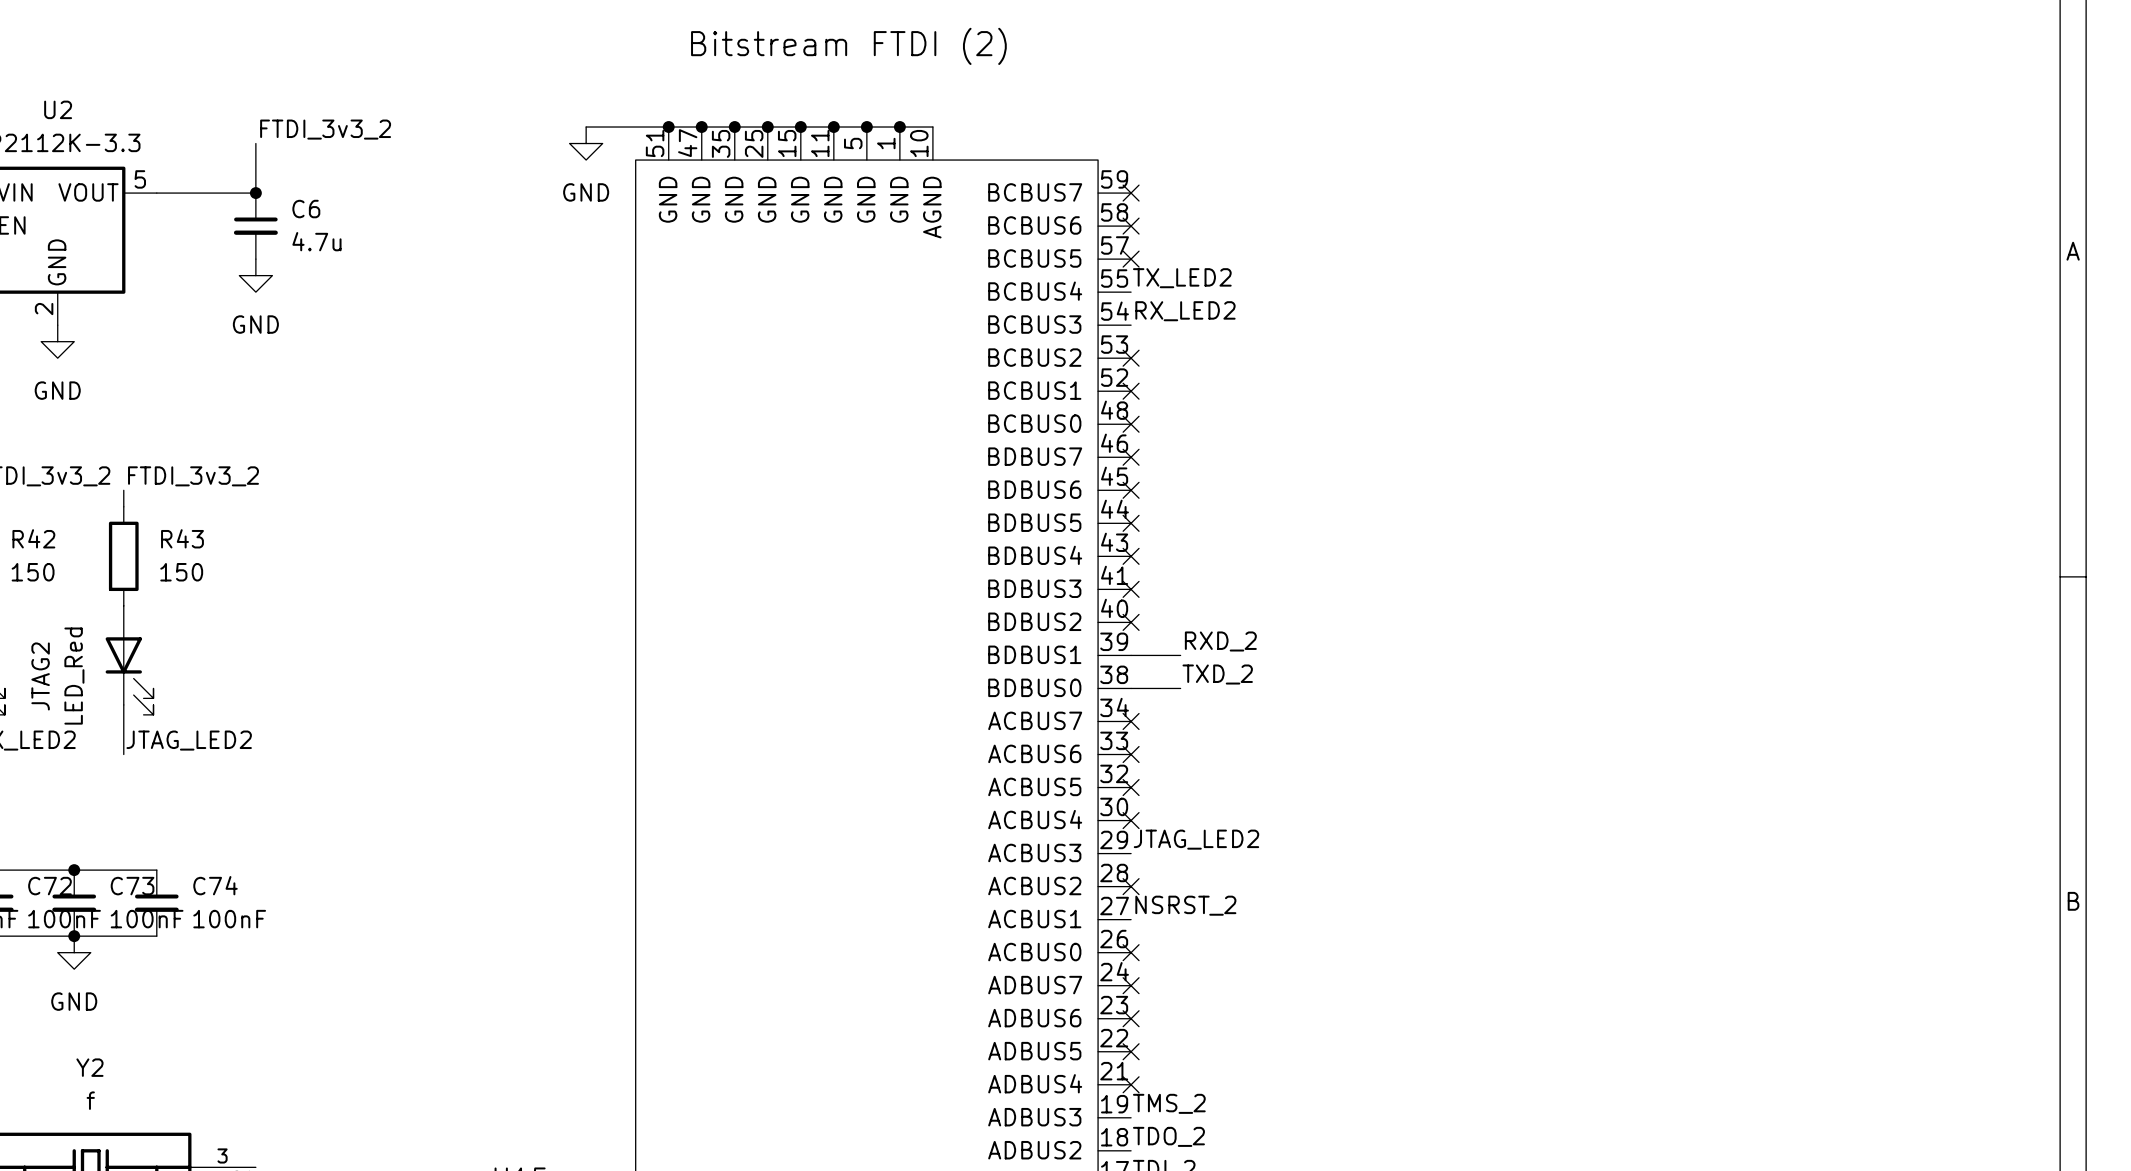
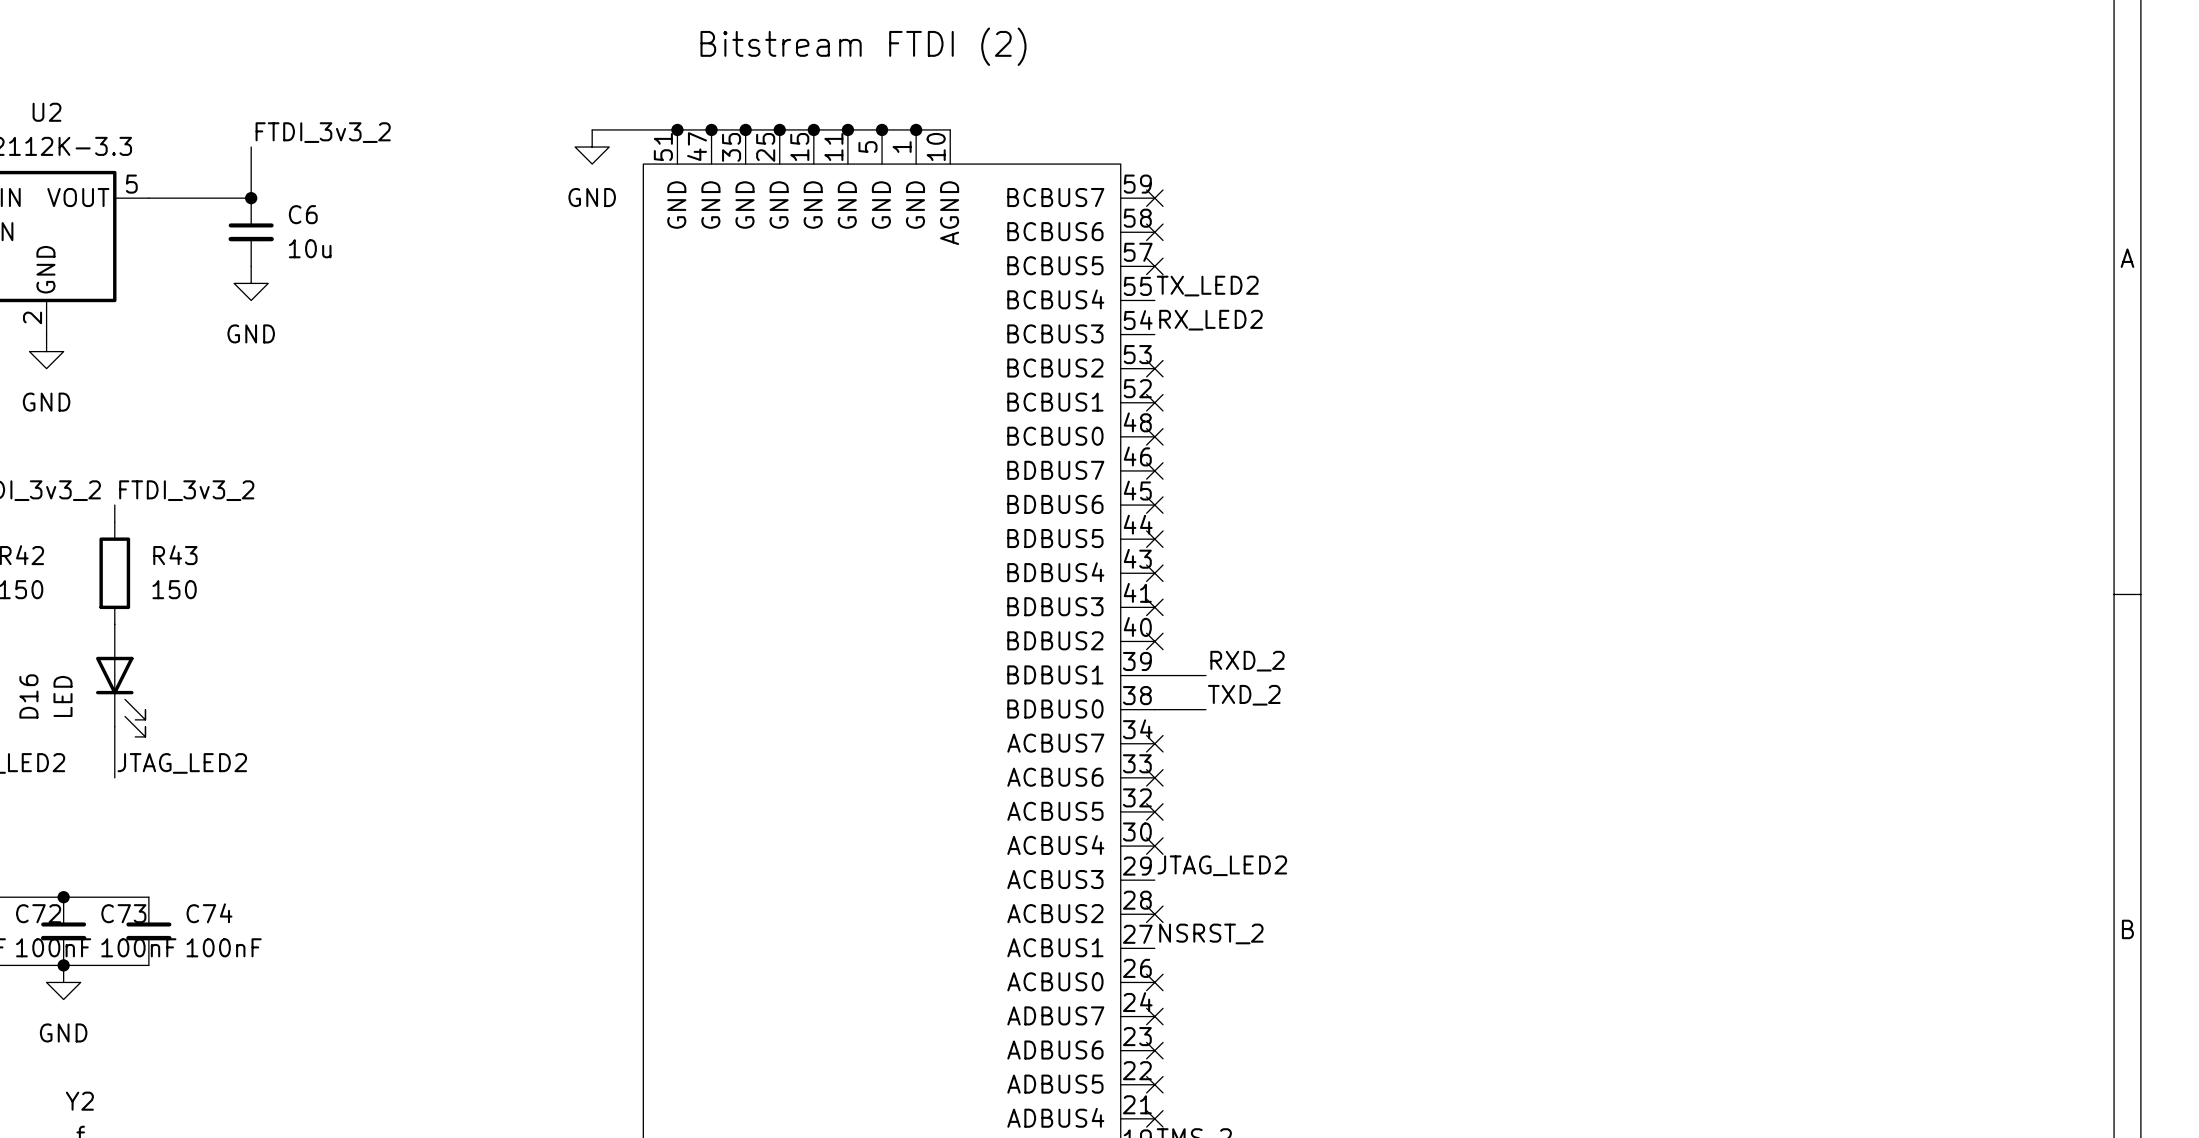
C6 value: 4.7u (316, 241) -> 10u (310, 248)
JTAG2 name: JTAG2 (40, 676) -> D16 (28, 696)
JTAG2 value: LED_Red (74, 676) -> LED (63, 696)

